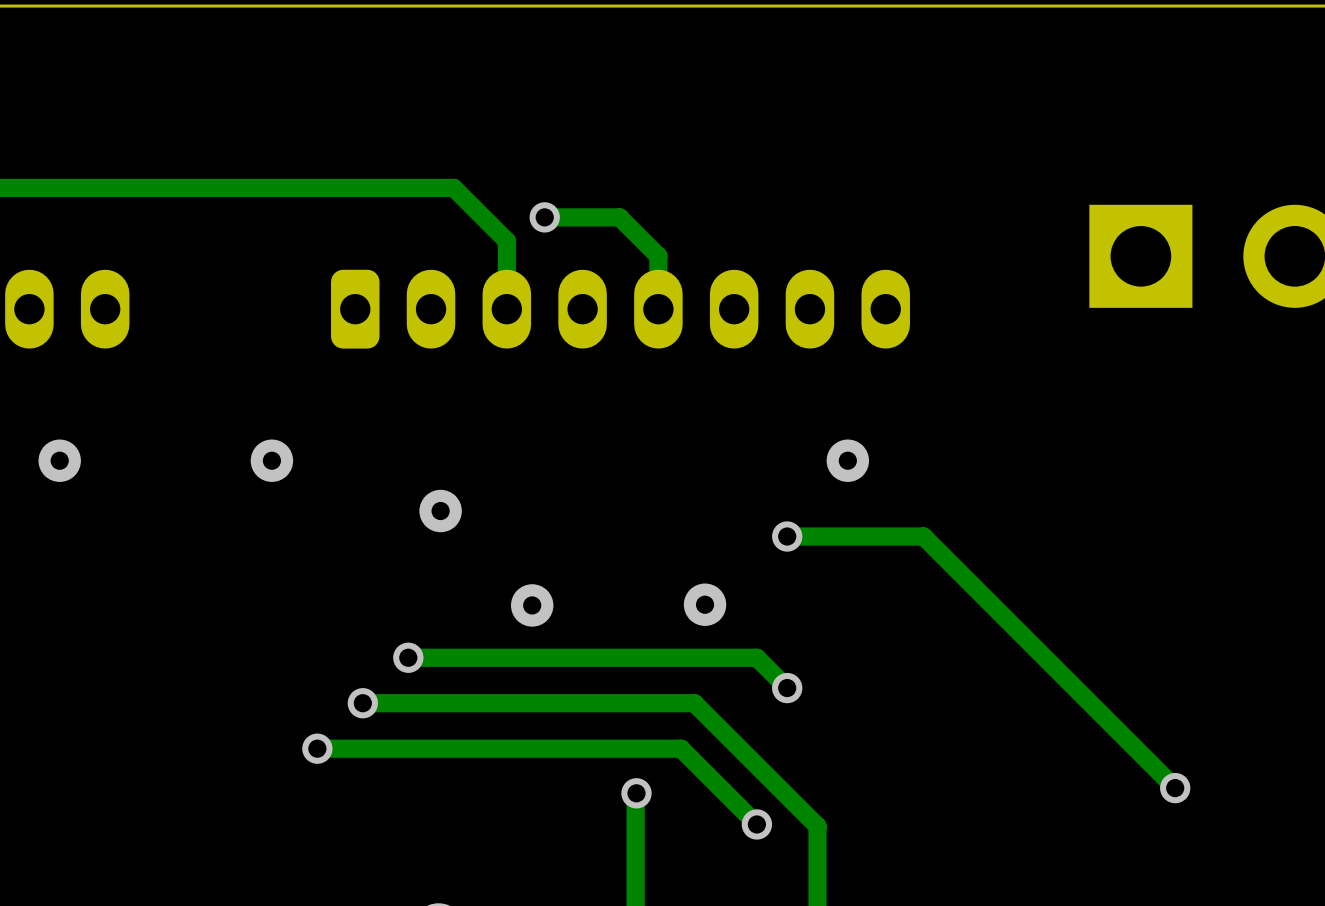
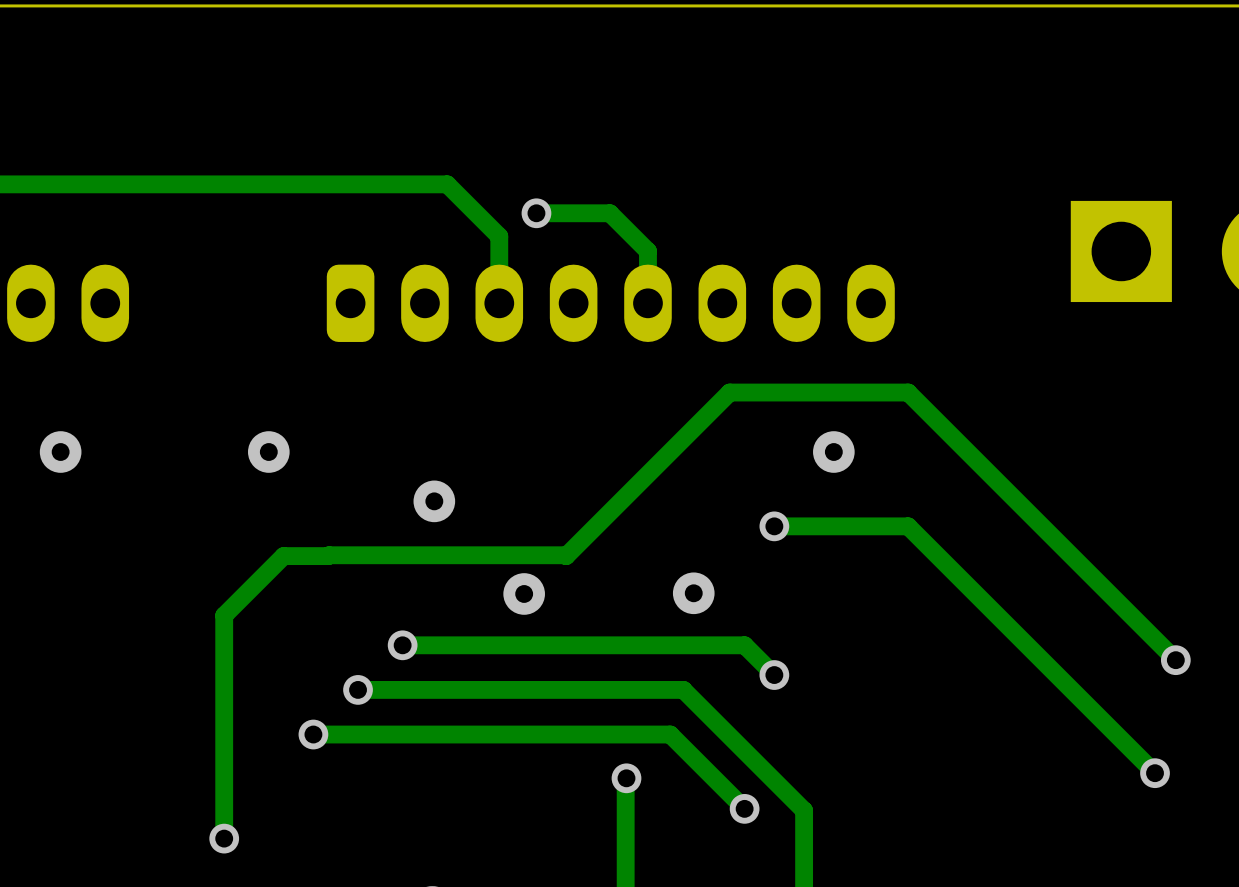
track: none -> (565, 555) (329, 555)
track: none -> (328, 556) (283, 556) (224, 615) (224, 838)
track: none -> (566, 556) (729, 392) (908, 392) (1175, 660)
via: none -> (1175, 660)
via: none -> (224, 838)

